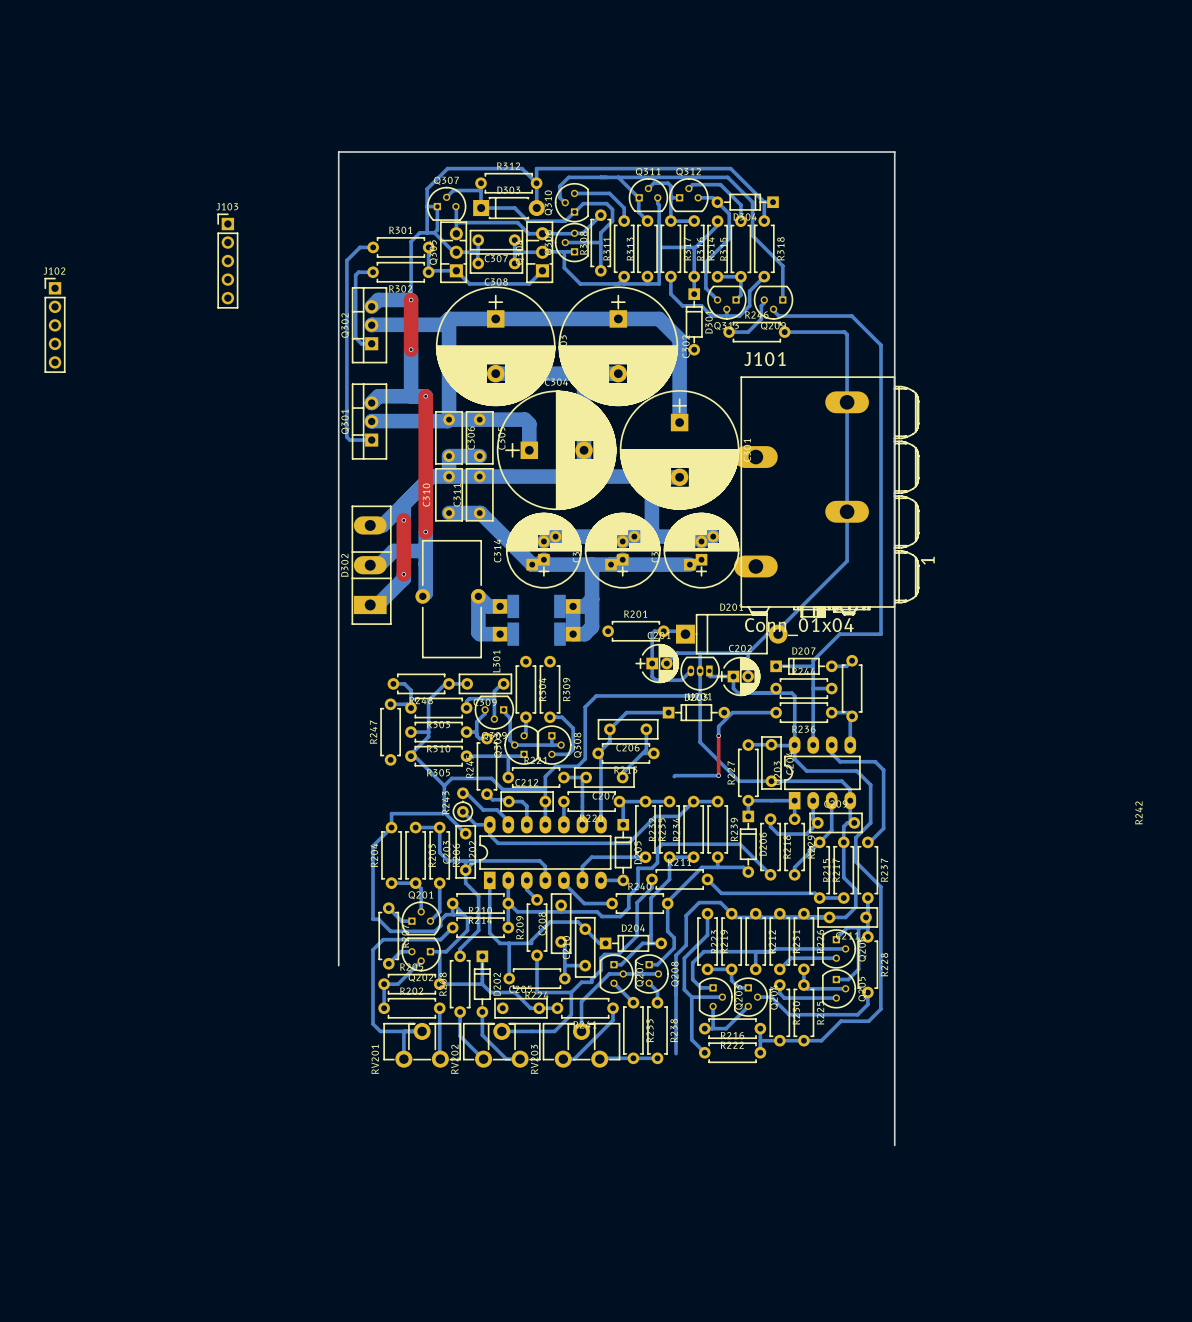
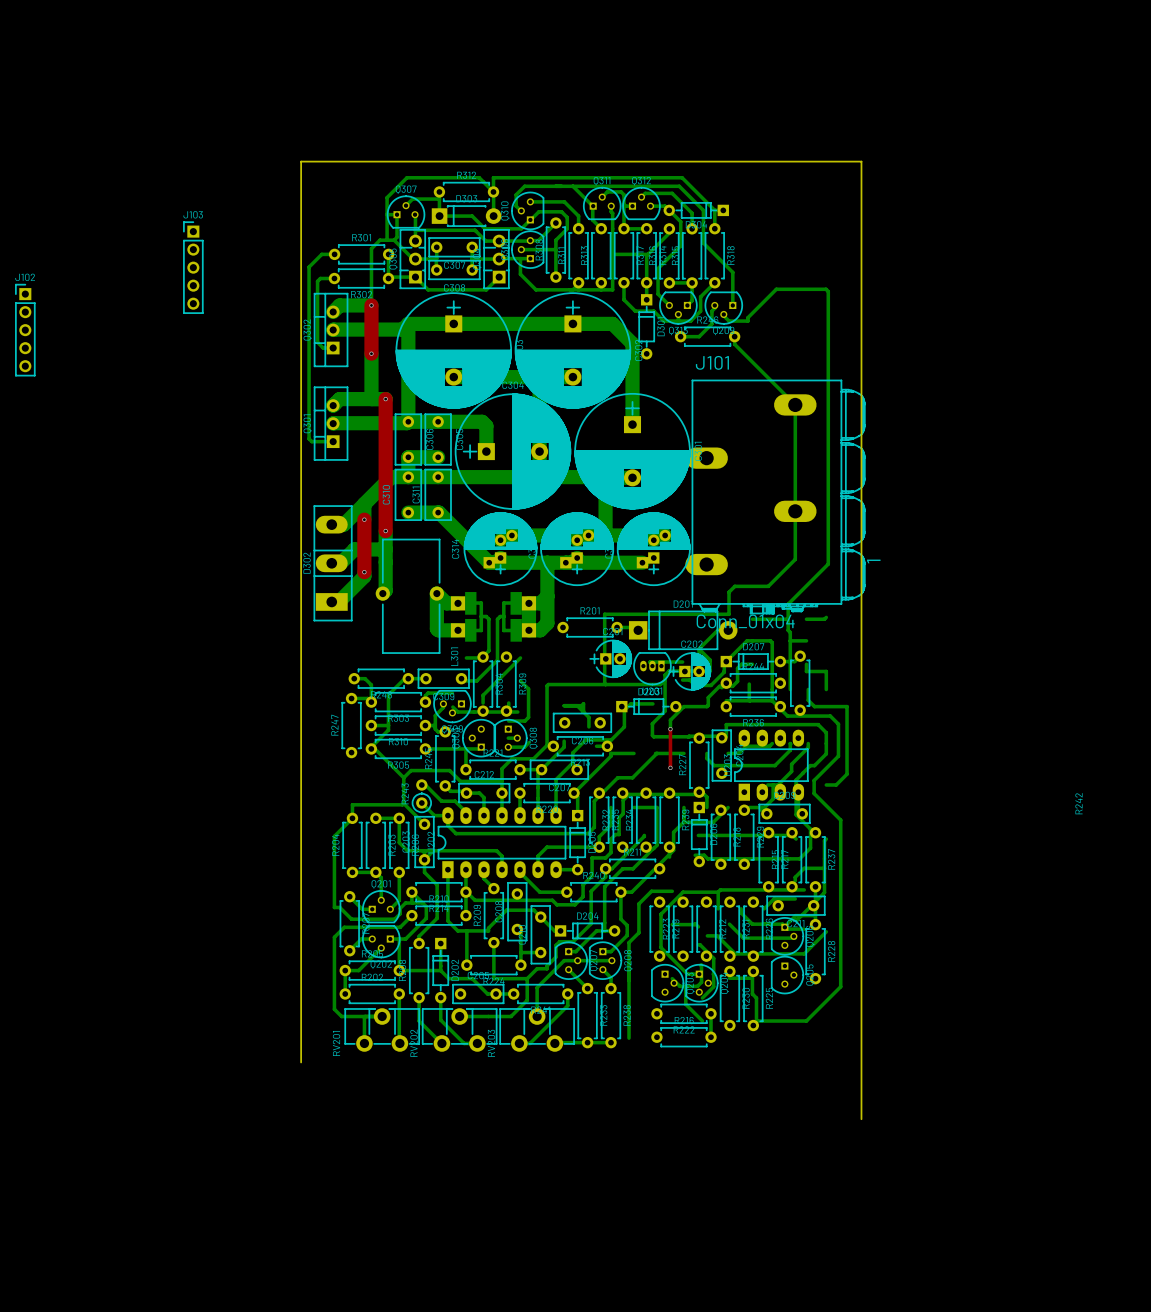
board edge: (894, 151) (894, 1145) -> (841, 161) (861, 161) (861, 1119)
bottom track: (798, 316) (851, 316) (881, 345) -> (747, 321) (747, 317) (776, 289) (826, 289) (828, 291) (828, 349)
bottom track: (784, 332) (844, 332) (847, 334) (847, 402) -> (734, 336) (734, 344) (795, 404)
bottom track: (881, 566) (881, 634) (839, 634) (813, 660) (813, 745) -> (828, 564) (788, 604) (790, 689)
bottom track: (819, 588) (778, 630) -> (768, 586) (734, 586) (729, 592) (729, 614) (604, 614) (605, 684)
bottom track: none -> (470, 603) (481, 603) (481, 630) (470, 630)
bottom track: none -> (516, 603) (503, 603) (503, 630) (516, 630)
bottom track: none -> (481, 616) (486, 616) (488, 619) (488, 650) (481, 657) (466, 657)
bottom track: none -> (503, 616) (497, 619) (497, 660) (476, 680) (466, 680)
bottom track: none -> (826, 617) (824, 619) (806, 619)
bottom track: none -> (752, 619) (788, 619)
bottom track: (663, 631) (654, 631) (652, 633) (652, 676) (655, 680) (681, 680) (690, 670) -> none
bottom track: none -> (790, 640) (806, 640)
bottom track: (700, 653) (700, 730) -> (699, 649) (710, 660) (710, 671) (669, 671) (665, 675) (665, 711) (652, 723)
bottom track: (748, 653) (677, 653) (666, 663) -> none
bottom track: none -> (520, 657) (483, 695) (483, 703)
bottom track: none -> (682, 662) (649, 662)
bottom track: (776, 666) (813, 666) -> none
bottom track: none -> (806, 664) (806, 671) (826, 671) (826, 689)
bottom track: (709, 670) (710, 676) (733, 676) (733, 688) (738, 693) (791, 693) (794, 696) (794, 745) (748, 745) -> none
bottom track: (503, 683) (494, 691) (494, 719) -> none
bottom track: none -> (682, 680) (689, 680) (695, 685) (710, 685) (724, 672) (724, 663) (747, 640) (770, 640) (772, 642) (772, 700) (787, 716) (830, 716) (838, 724) (838, 756) (814, 780) (814, 793) (840, 820) (840, 986) (806, 1021) (756, 1021) (756, 998) (752, 993) (752, 978) (729, 978)
bottom track: none -> (520, 680) (528, 689) (528, 717) (524, 721) (508, 721)
bottom track: (813, 688) (831, 688) -> none
bottom track: none -> (749, 684) (749, 700)
bottom track: (700, 695) (596, 695) (585, 707) (585, 758) -> (665, 680) (660, 684) (548, 684) (547, 745) (540, 751)
bottom track: none -> (808, 689) (808, 700) (814, 706) (847, 706) (847, 774) (836, 784) (826, 784)
bottom track: none -> (772, 700) (726, 700)
bottom track: none -> (508, 703) (509, 712)
bottom track: (503, 709) (510, 718) (510, 740) (514, 745) (551, 745) (551, 735) -> none
bottom track: none -> (564, 705) (581, 705) (583, 703) (583, 711)
bottom track: none -> (577, 705) (588, 717) (588, 726)
bottom track: (668, 712) (626, 712) (609, 729) (609, 741) (598, 753) (600, 756) (600, 787) -> (652, 703) (630, 703) (624, 710) (624, 726) (611, 739) (585, 739) (572, 753) (572, 762) (556, 779)
bottom track: (756, 712) (776, 712) -> (706, 706) (708, 697) (719, 686) (732, 686) (737, 681) (737, 668) (741, 664) (752, 664)
bottom track: (831, 712) (848, 712) (852, 716) (850, 718) (850, 745) -> none
bottom track: none -> (452, 707) (457, 712) (517, 712)
bottom track: (525, 717) (525, 733) (524, 735) -> none
bottom track: (550, 717) (562, 717) (573, 728) (573, 749) -> none
bottom track: (646, 729) (646, 749) (622, 773) (622, 777) -> none
bottom track: (701, 743) (739, 781) (841, 781) (849, 789) (849, 801) -> (653, 736) (690, 736)
bottom track: none -> (688, 736) (726, 736) (726, 724) (818, 724) (826, 732) (826, 753) (814, 765) (810, 765) (802, 773)
bottom track: (794, 745) (794, 758) (806, 771) (856, 771) (870, 784) (870, 822) (855, 837) (855, 861) (880, 886) (880, 1009) (868, 1021) (840, 1021) (821, 1040) (760, 1040) -> none
bottom track: (831, 745) (831, 753) (840, 761) (875, 761) (883, 770) (883, 828) (867, 842) -> none
bottom track: none -> (564, 741) (564, 747) (541, 769)
bottom track: none -> (772, 743) (769, 746) (746, 746) (738, 753) (728, 753)
bottom track: none -> (808, 743) (808, 747) (791, 764) (791, 771) (778, 784) (767, 784)
bottom track: none -> (790, 744) (790, 750) (774, 765) (714, 765) (706, 758) (706, 753)
bottom track: none -> (655, 753) (683, 753)
bottom track: (718, 775) (674, 776) -> none
bottom track: none -> (802, 773) (796, 780) (796, 814) (810, 829) (810, 848) (799, 858) (707, 858) (704, 855) (695, 855)
bottom track: none -> (773, 784) (773, 798) (764, 807) (749, 807)
bottom track: (813, 800) (813, 818) (817, 822) (806, 834) (777, 834) (770, 826) (770, 819) -> none
bottom track: (831, 800) (831, 830) (794, 867) (794, 874) -> none
bottom track: (619, 801) (669, 801) -> (574, 793) (611, 756) (611, 753) (633, 753)
bottom track: (717, 801) (693, 801) (678, 816) (655, 816) (628, 843) -> (656, 753) (632, 777) (617, 777) (594, 801) (594, 827) (588, 833) (583, 833)
bottom track: none -> (611, 807) (611, 825) (599, 836) (599, 847)
bottom track: none -> (683, 807) (683, 822) (713, 822) (728, 807)
bottom track: (748, 816) (748, 800) (794, 800) (794, 819) -> none
bottom track: (854, 822) (847, 822) (843, 826) (843, 877) (855, 889) (855, 907) (845, 917) (731, 917) (731, 913) (720, 902) -> none
bottom track: (665, 844) (739, 844) (770, 874) -> (619, 834) (619, 817) (623, 813) (623, 800) (629, 794) (704, 794) (706, 797) (706, 807)
bottom track: none -> (644, 835) (611, 868) (605, 868)
bottom track: none -> (698, 835) (792, 835) (796, 839)
bottom track: none -> (826, 839) (824, 840) (824, 892) (795, 920)
bottom track: (693, 857) (669, 857) (669, 879) -> (633, 807) (656, 807) (656, 845) (633, 868) (622, 868)
bottom track: (748, 872) (743, 867) (701, 867) (667, 903) -> (683, 821) (673, 832) (673, 850) (631, 892) (620, 892)
bottom track: none -> (824, 868) (804, 868) (795, 877) (795, 880)
bottom track: (707, 879) (721, 893) (815, 893) (819, 897) (843, 897) -> none
bottom track: none -> (804, 889) (720, 889) (718, 892)
bottom track: none -> (718, 892) (718, 908)
bottom track: none -> (795, 898) (774, 898) (764, 908)
bottom track: (707, 913) (707, 935) (684, 958) (684, 989) (691, 997) -> none
bottom track: none -> (741, 908) (741, 912) (752, 924) (782, 924) (787, 929) (804, 929)
bottom track: (858, 927) (858, 969) (848, 979) (836, 979) -> none
bottom track: none -> (672, 924) (695, 923) (698, 926)
bottom track: none -> (729, 924) (743, 938) (795, 938)
bottom track: none -> (826, 931) (804, 953) (735, 953) (717, 935) (707, 935)
bottom track: (845, 948) (703, 951) (692, 962) (692, 979) (701, 987) (713, 987) -> none
bottom track: (755, 951) (755, 969) -> none
bottom track: none -> (698, 944) (713, 958) (713, 986) (702, 998)
bottom track: (836, 958) (790, 958) (779, 969) -> none
board edge: none -> (301, 952) (301, 1062)
bottom track: (707, 969) (731, 969) (731, 980) (739, 987) -> (718, 892) (683, 892) (661, 914) (661, 947) (687, 974) (690, 974)
bottom track: (803, 969) (803, 985) (807, 988) (845, 988) -> none
bottom track: none -> (700, 965) (701, 982) (697, 986) (679, 986) (672, 978)
bottom track: (779, 985) (779, 993) (784, 998) (836, 998) -> none
bottom track: (867, 992) (867, 1004) (857, 1014) (789, 1014) (771, 997) (757, 997) -> none
bottom track: (691, 997) (722, 997) -> none
bottom track: (691, 997) (691, 1039) (704, 1052) -> none
bottom track: none -> (685, 986) (685, 1004) (702, 1021)
bottom track: (713, 1006) (712, 1028) -> none
bottom track: (748, 1006) (726, 1028) (704, 1028) -> none

